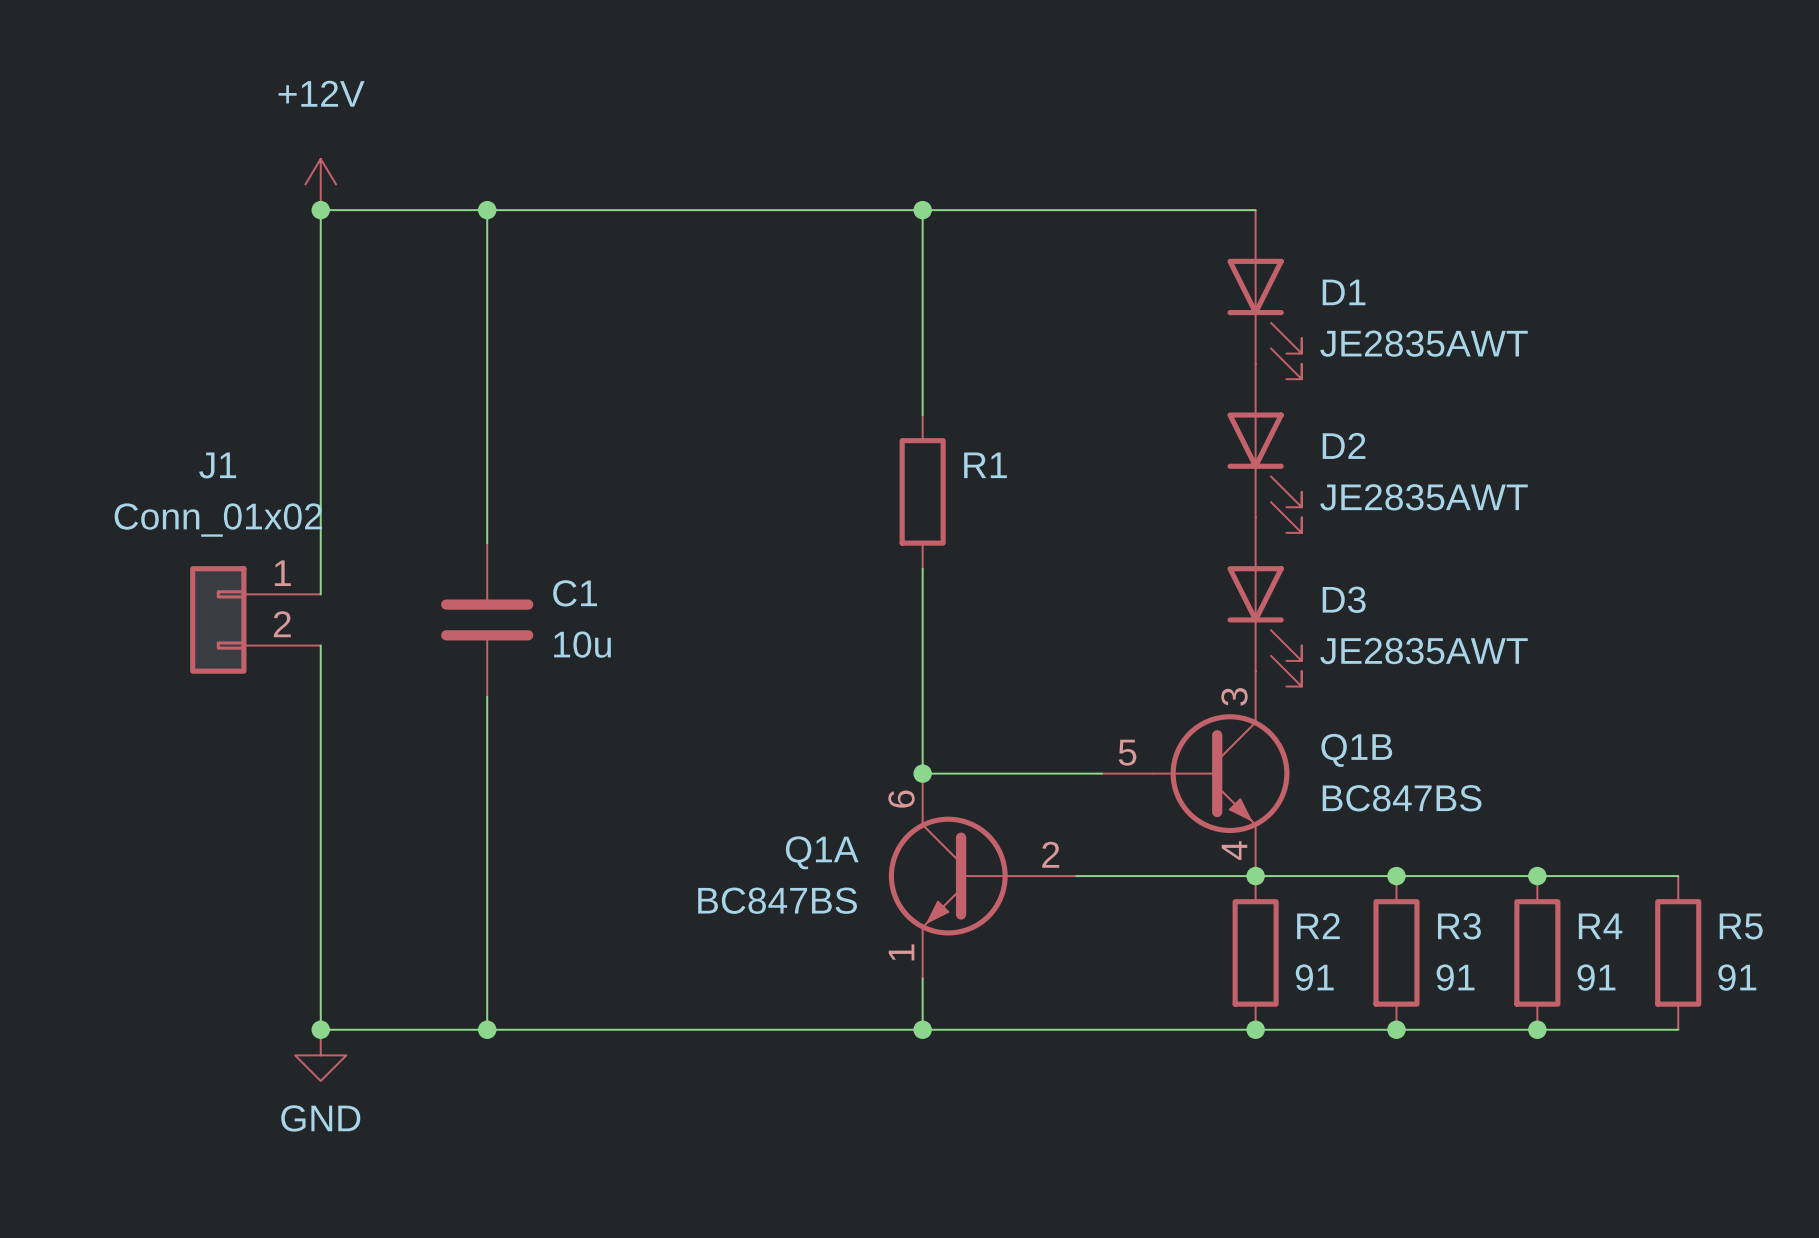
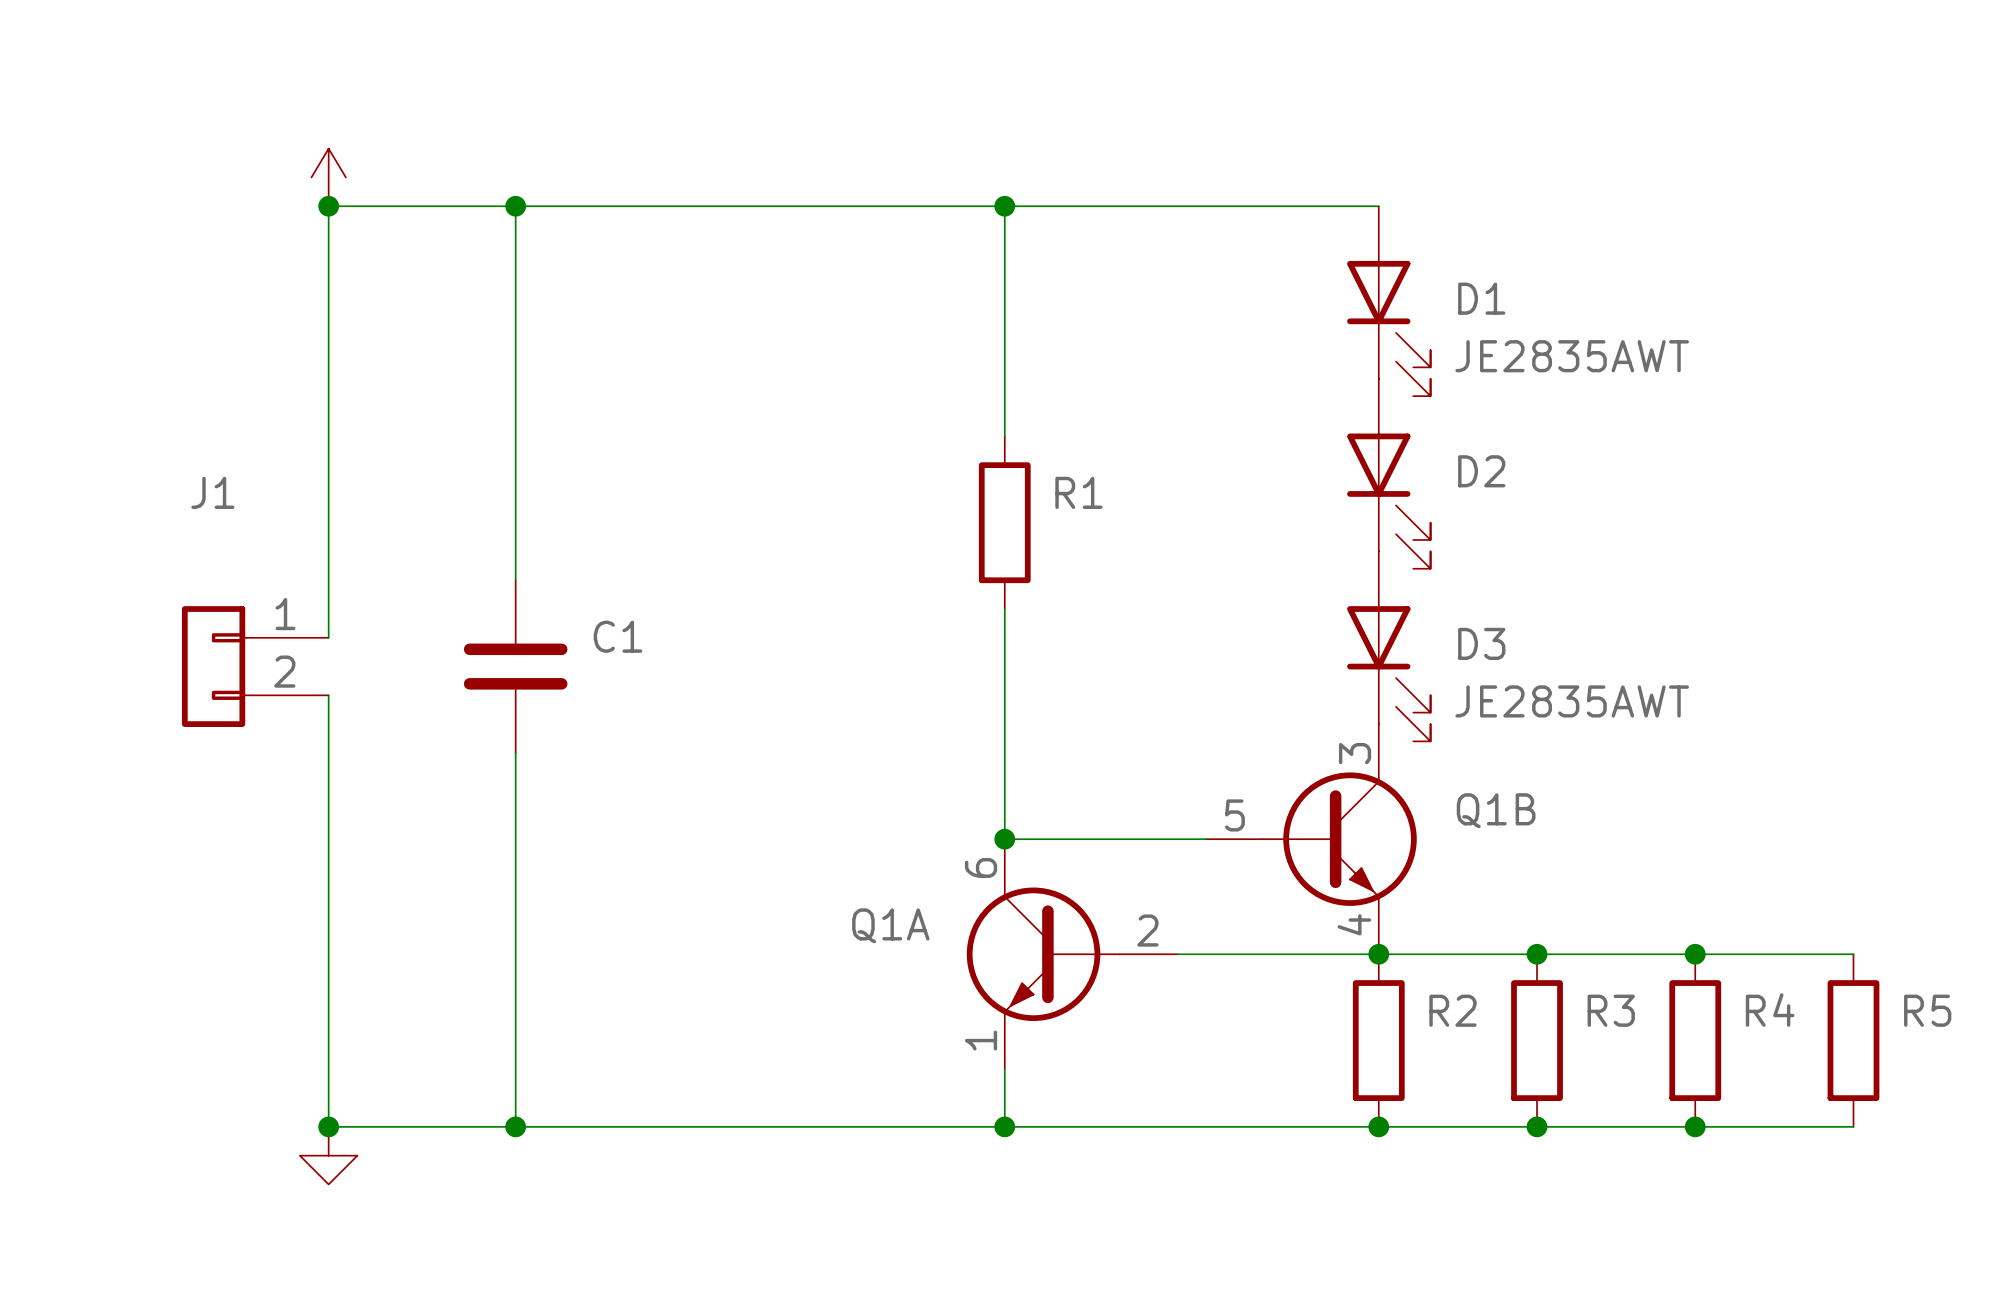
power symbol text: +12V (321, 93) -> none
D2 value: JE2835AWT (1424, 497) -> none
J1 value: Conn_01x02 (218, 520) -> none
C1 value: 10u (582, 644) -> none
Q1B value: BC847BS (1402, 798) -> none
Q1A value: BC847BS (777, 900) -> none
R2 value: 91 (1314, 977) -> none
R3 value: 91 (1455, 977) -> none
R4 value: 91 (1596, 977) -> none
R5 value: 91 (1737, 977) -> none
power symbol text: GND (320, 1118) -> none

